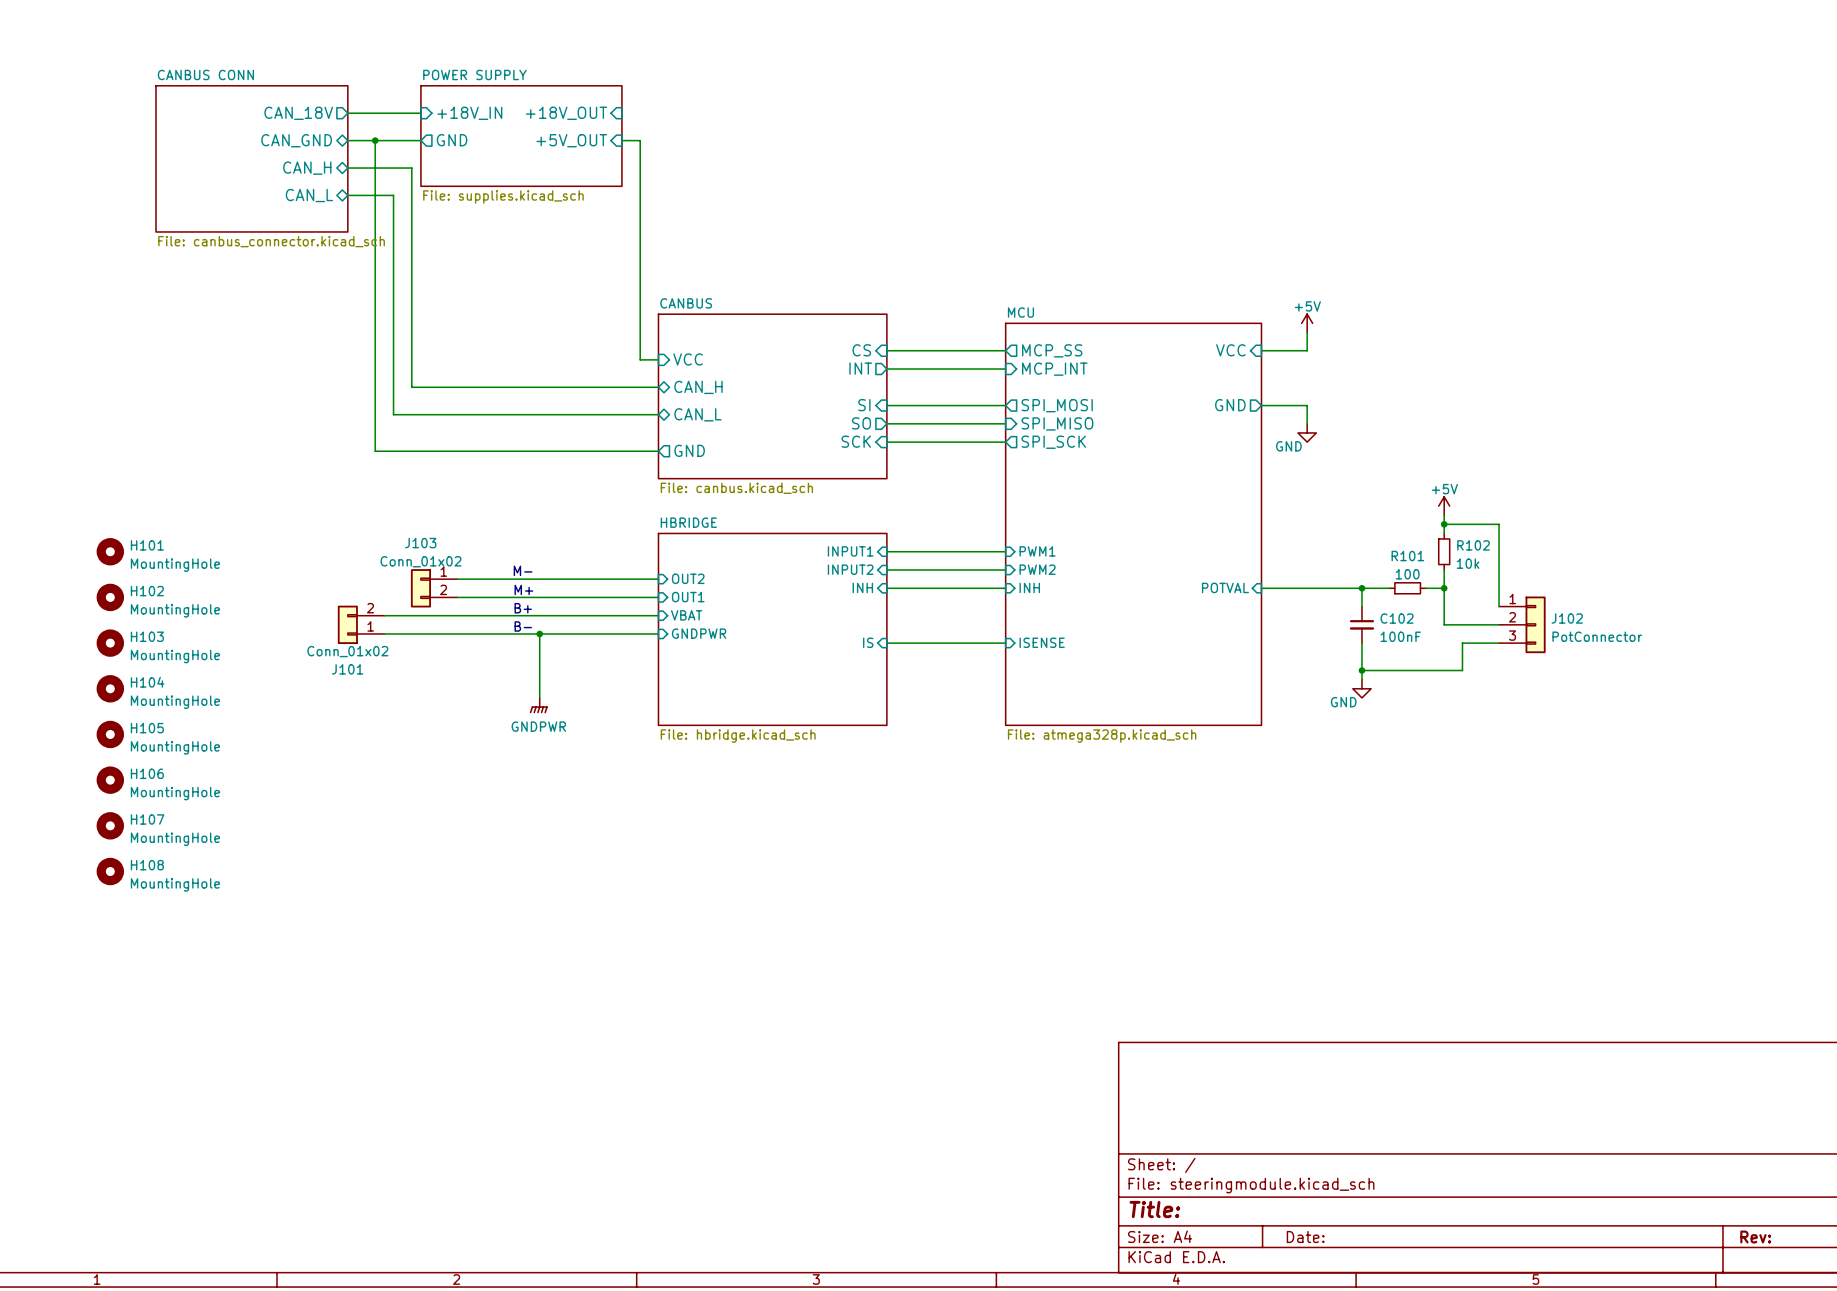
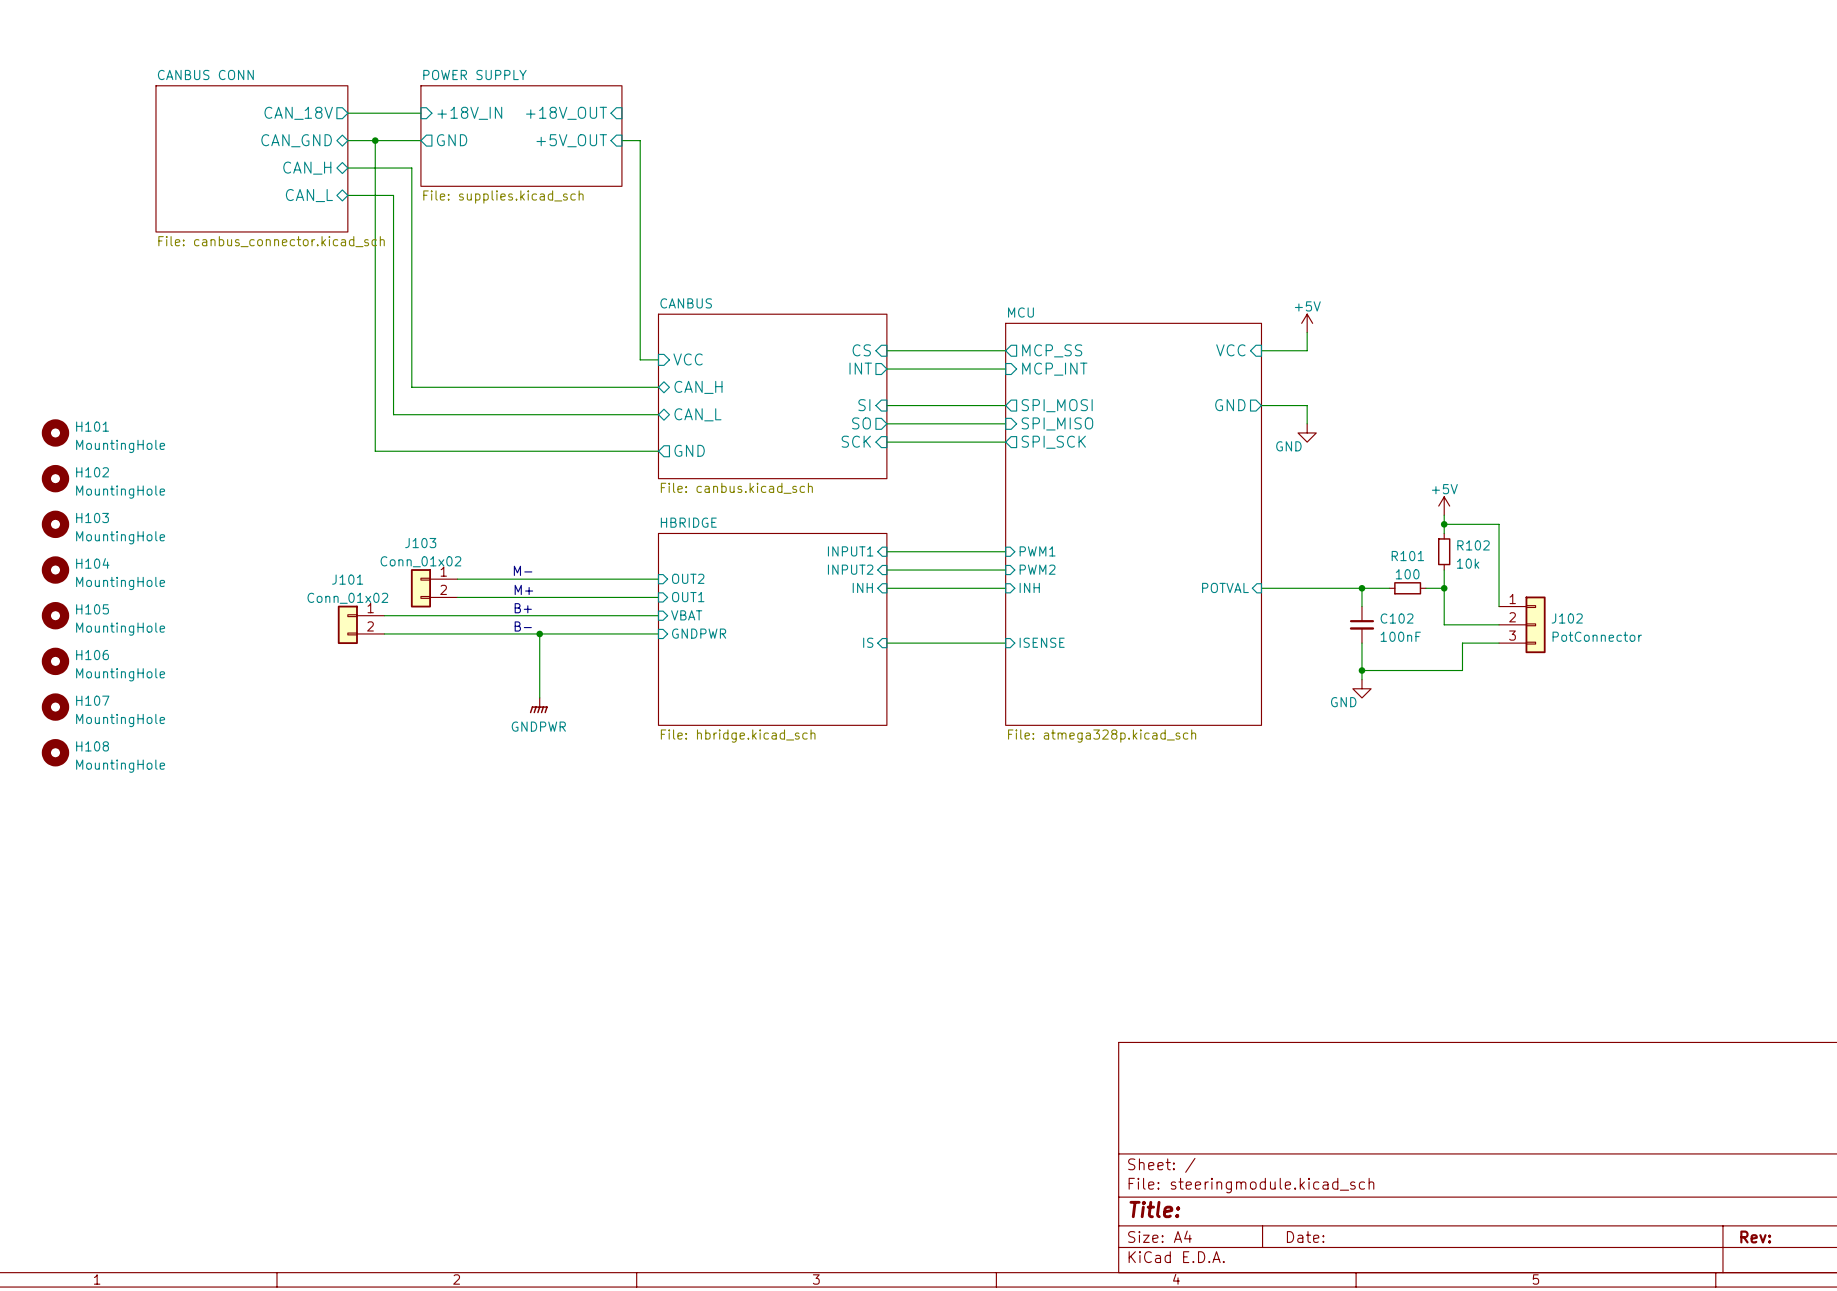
H101 position: (110, 551) -> (55, 432)
H102 position: (110, 597) -> (55, 478)
J101 flip: as is (347, 624) -> up-down (347, 624)
H103 position: (110, 643) -> (55, 524)
H104 position: (110, 688) -> (55, 570)
H105 position: (110, 734) -> (55, 615)
H106 position: (110, 780) -> (55, 661)
H107 position: (110, 825) -> (55, 707)
H108 position: (110, 871) -> (55, 752)

